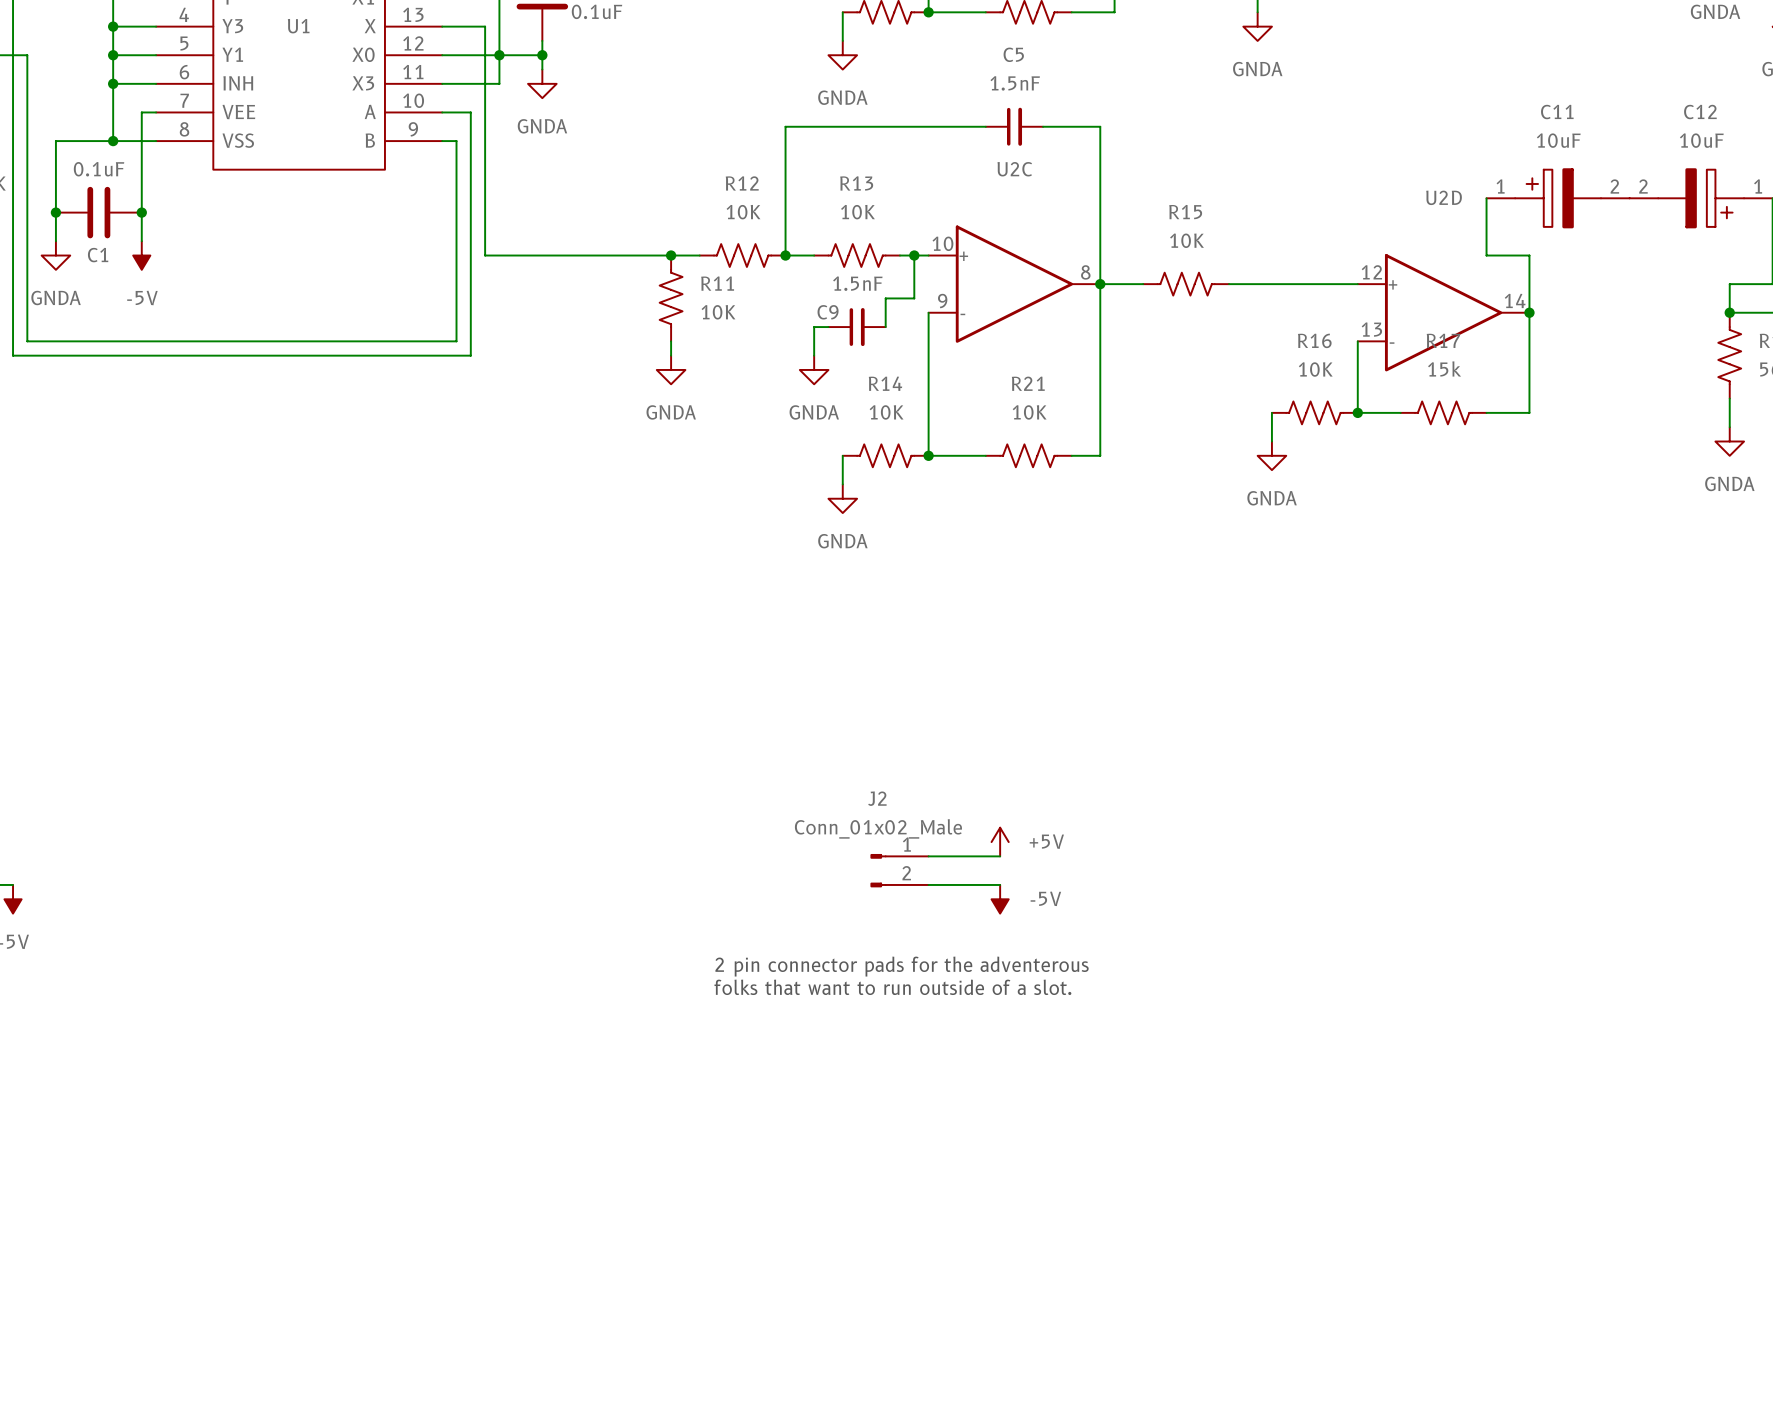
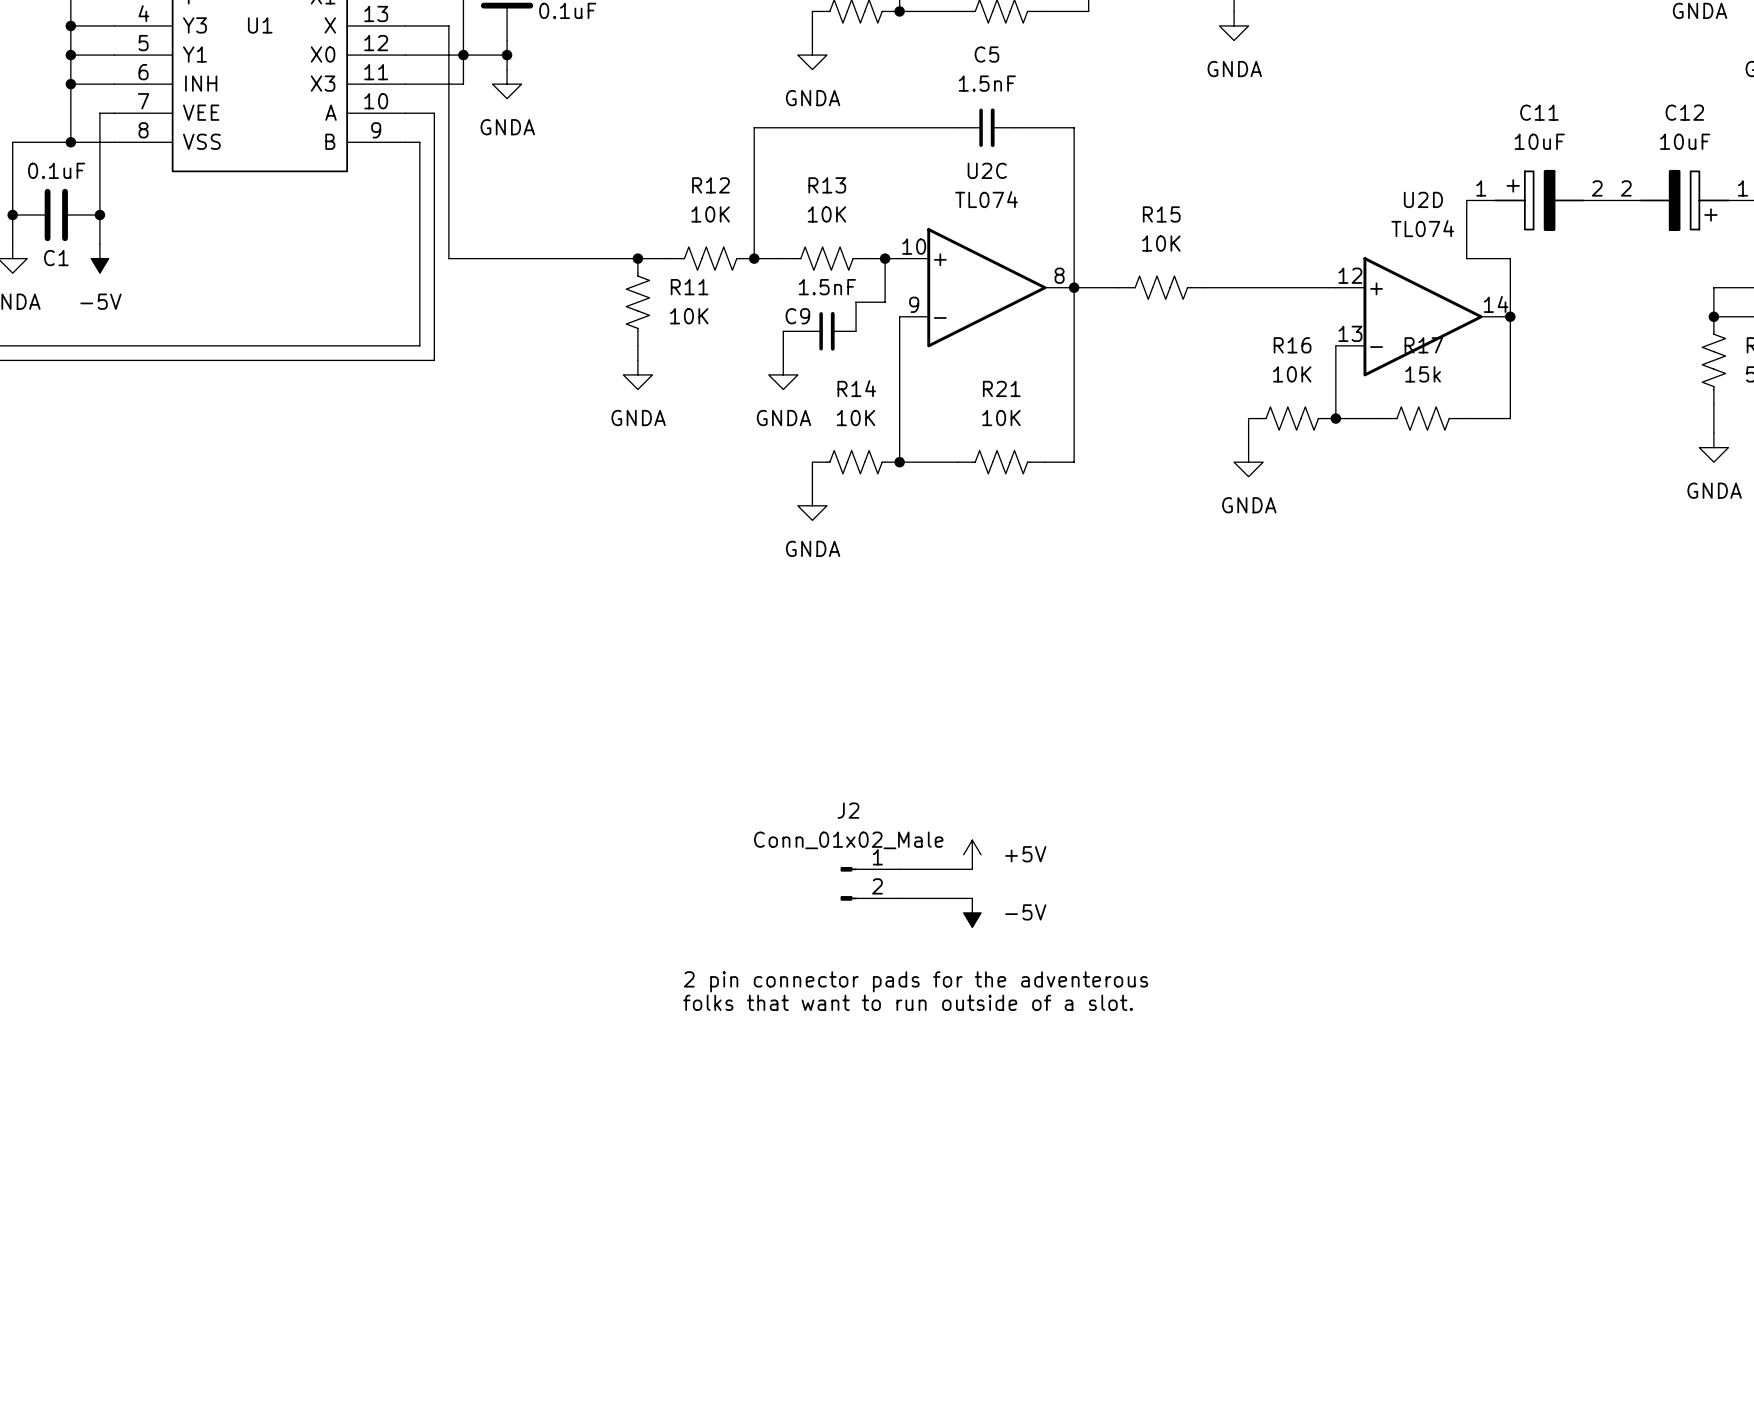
U2C value: none -> TL074 (986, 199)
U2D value: none -> TL074 (1422, 228)

